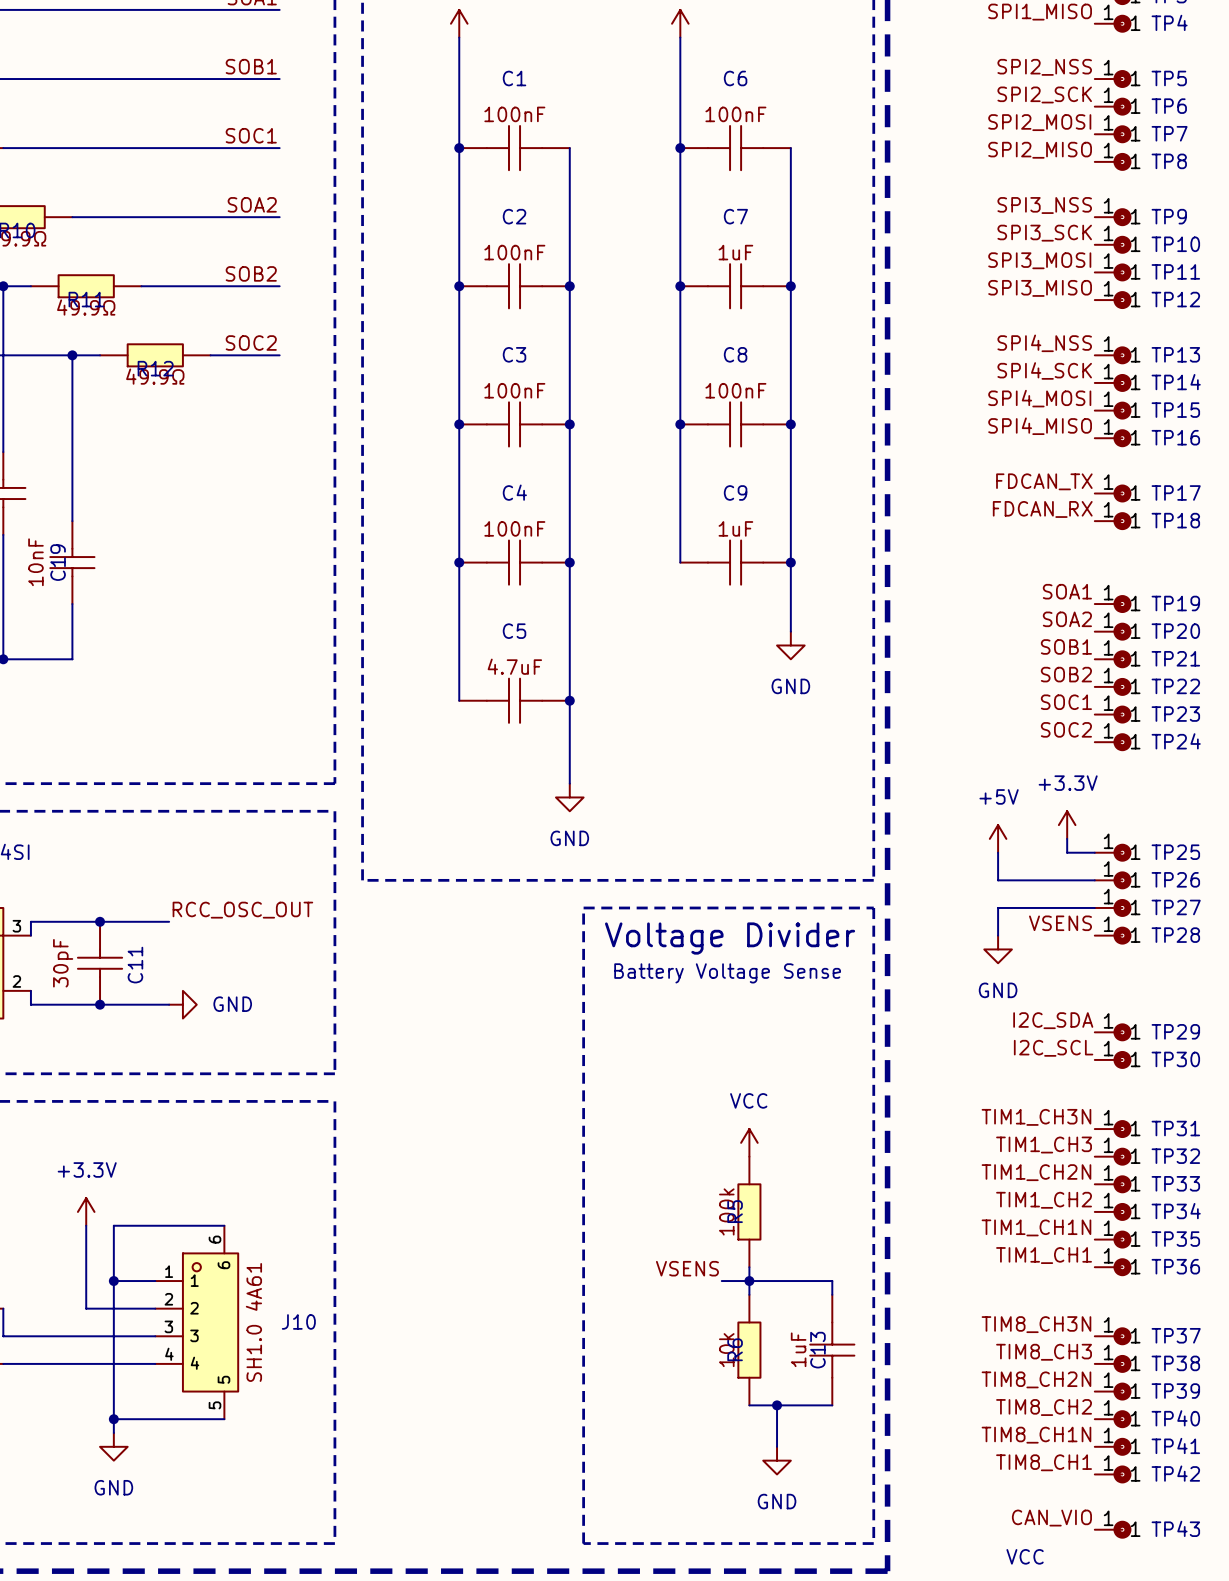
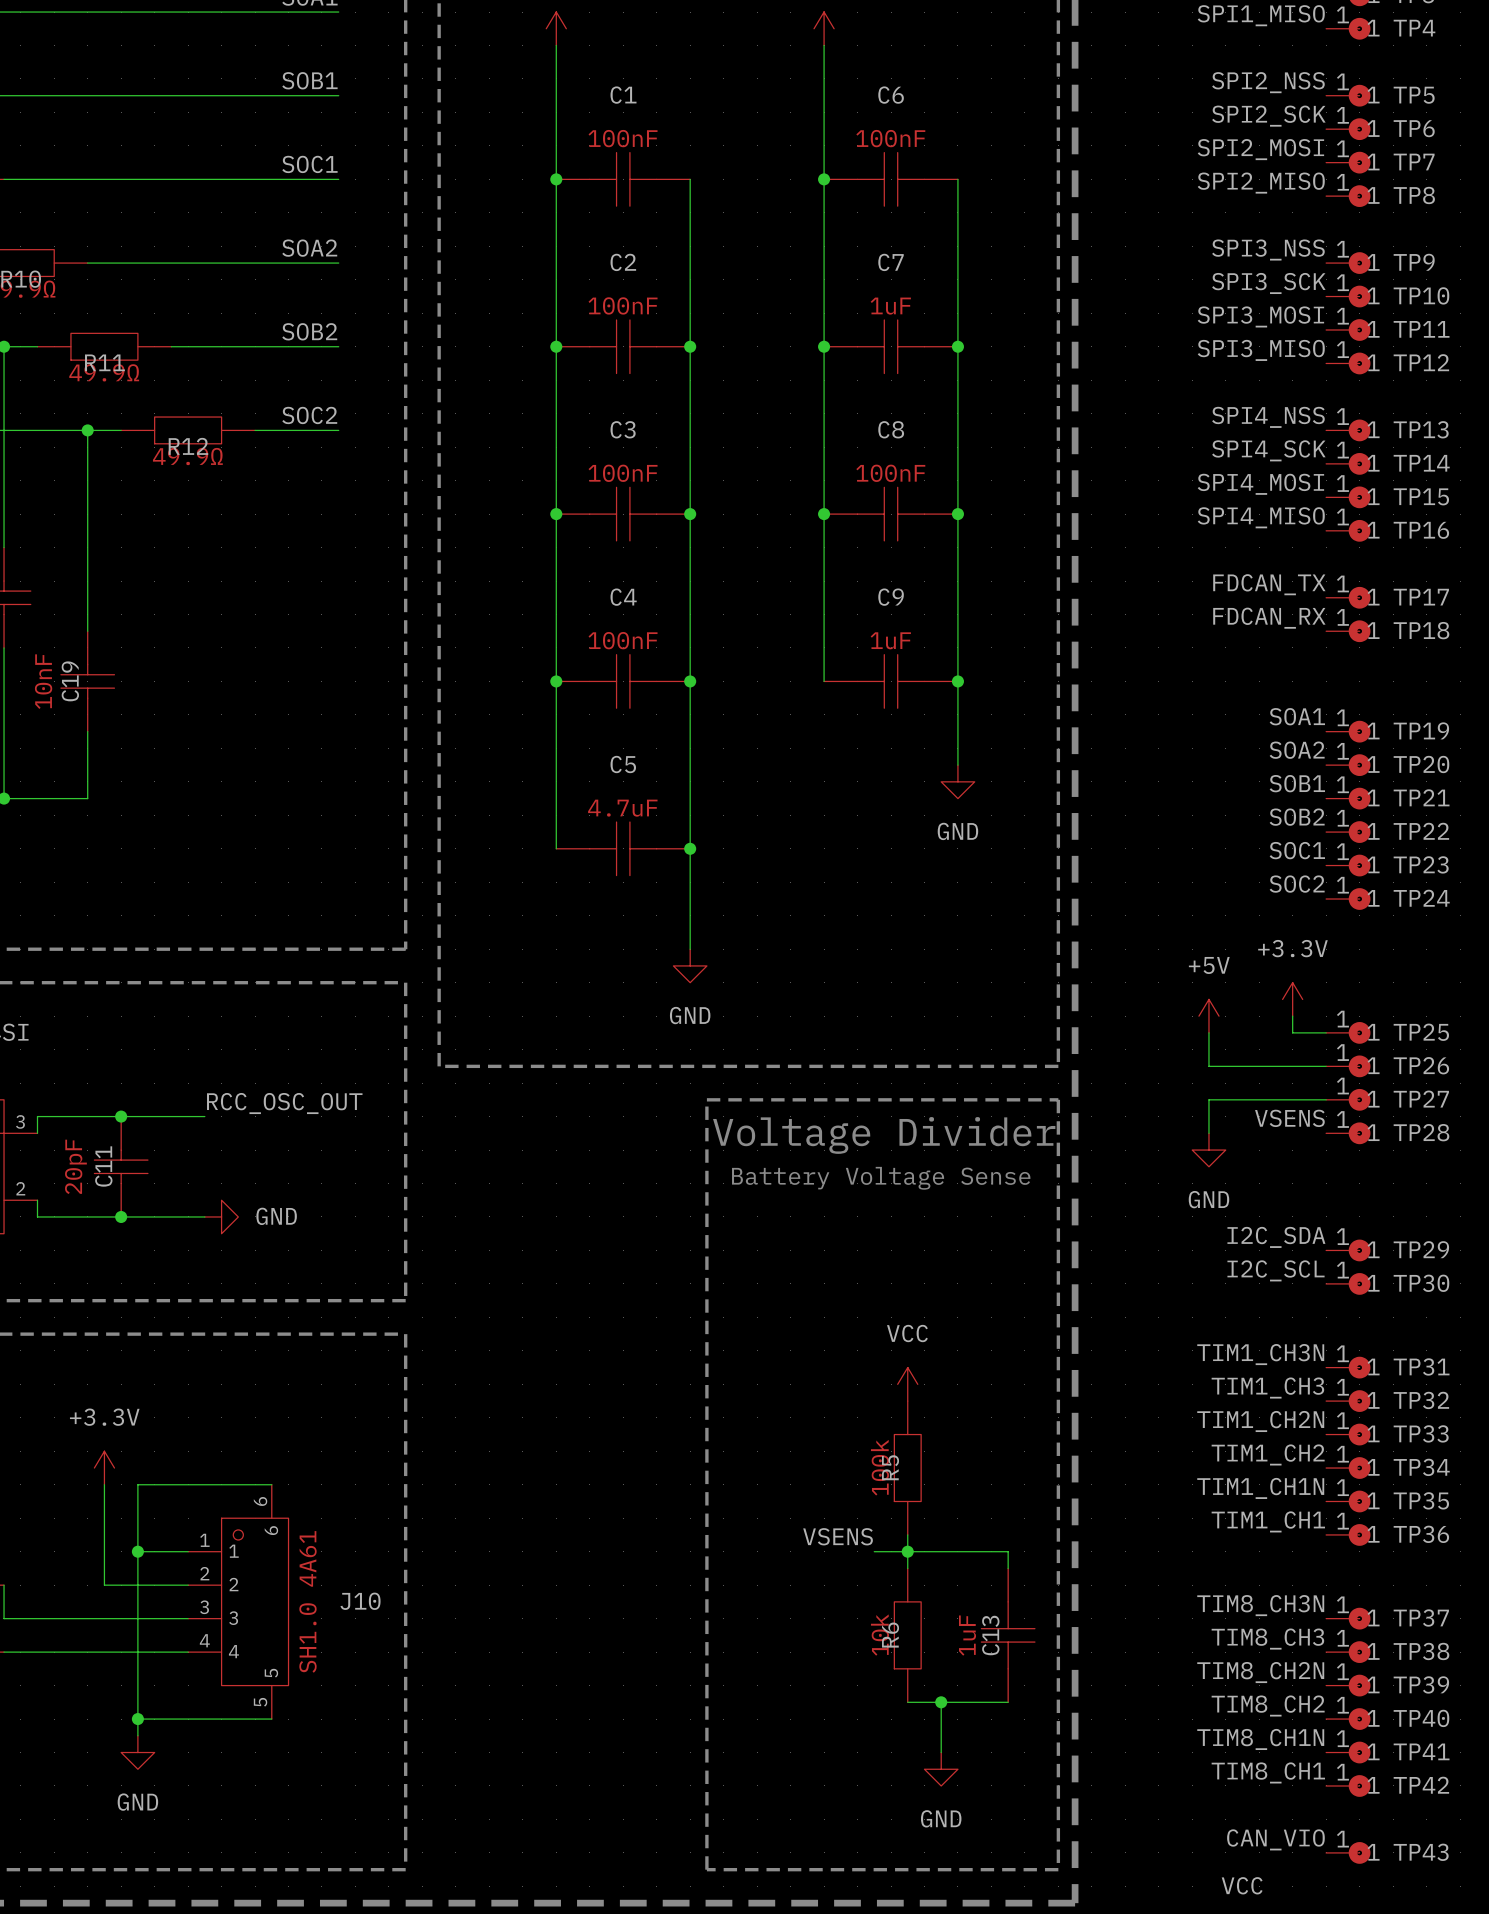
C11 text: 30pF (63, 963) -> 20pF (75, 1166)
C11 name position: C11 (135, 965) -> C11 (103, 1166)

